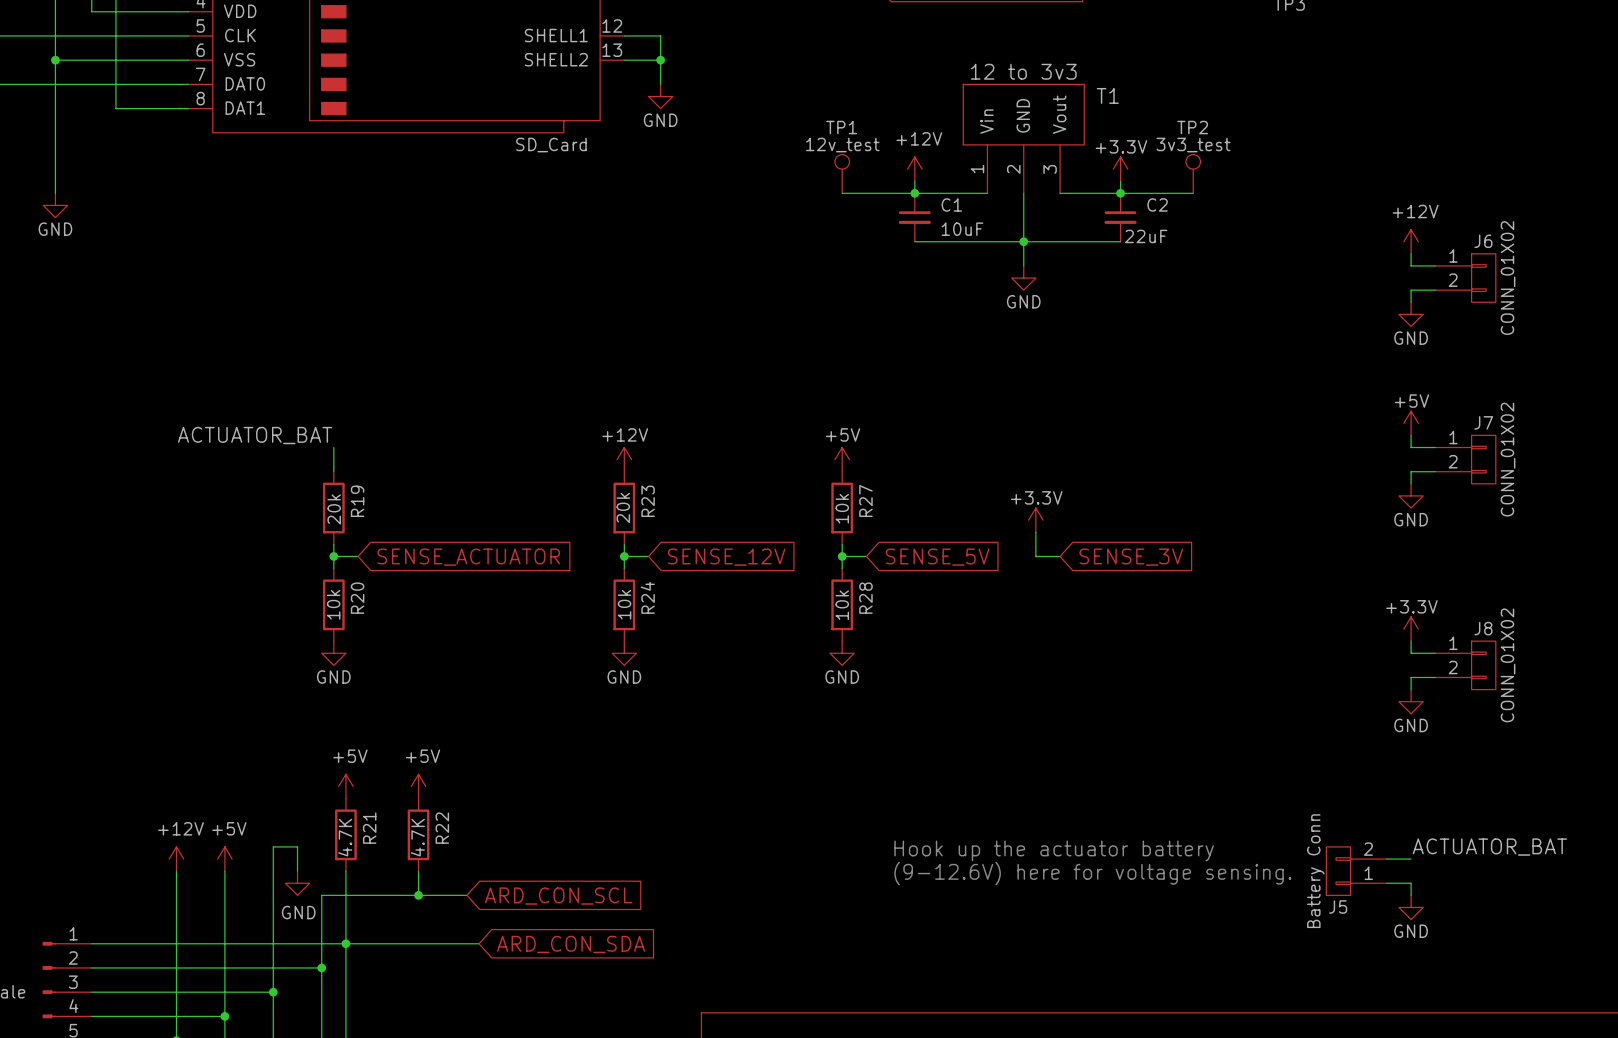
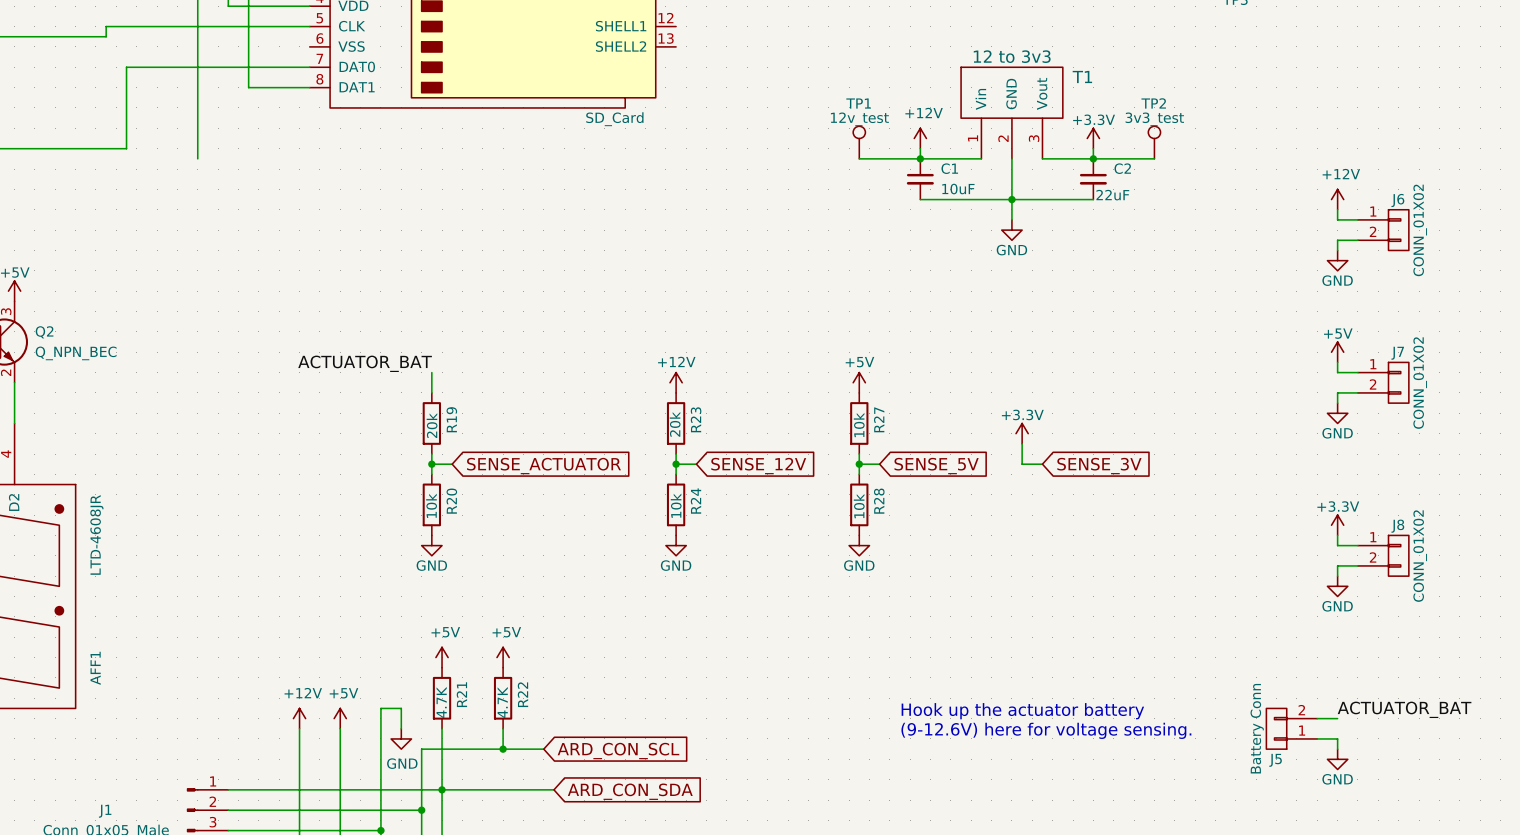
wire: (624, 35) (660, 35) (660, 84) -> none
wire: (55, 60) (188, 60) -> none
junction: (55, 60) -> none
wire: (624, 60) (660, 60) -> none
junction: (660, 60) -> none
power symbol: GND (660, 96) -> none
power symbol: GND (55, 205) -> none

